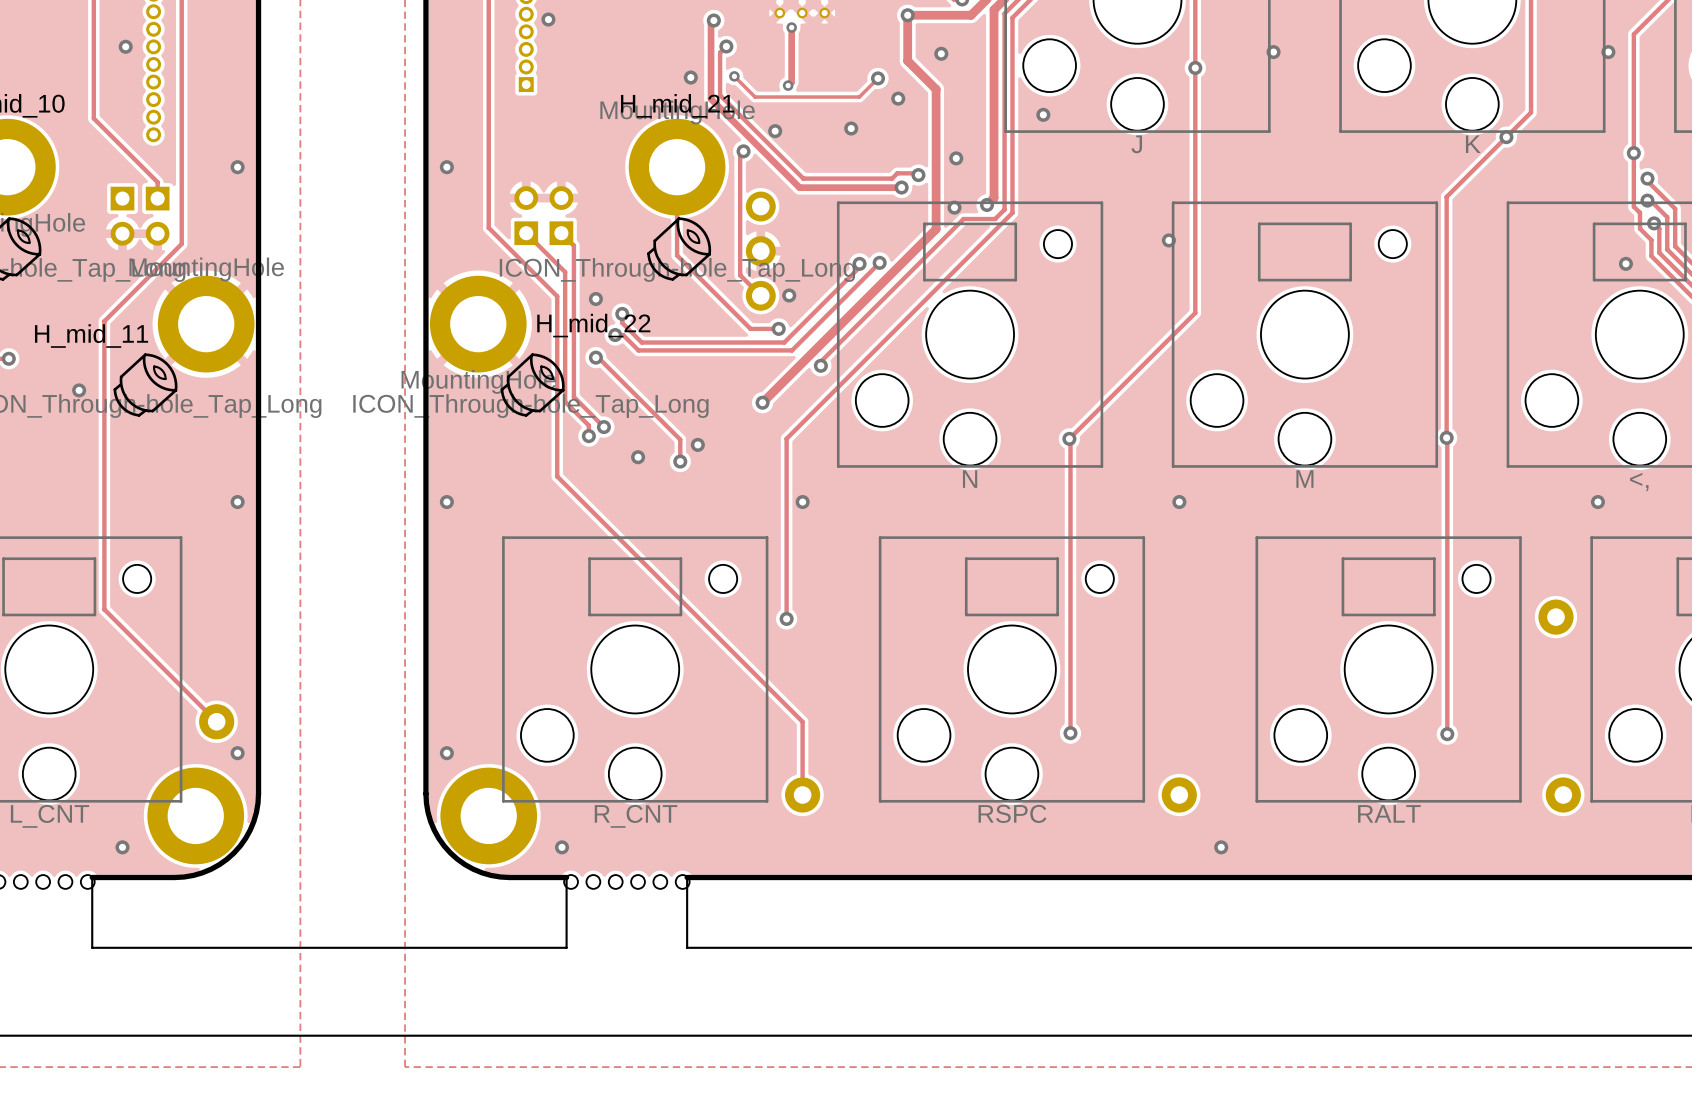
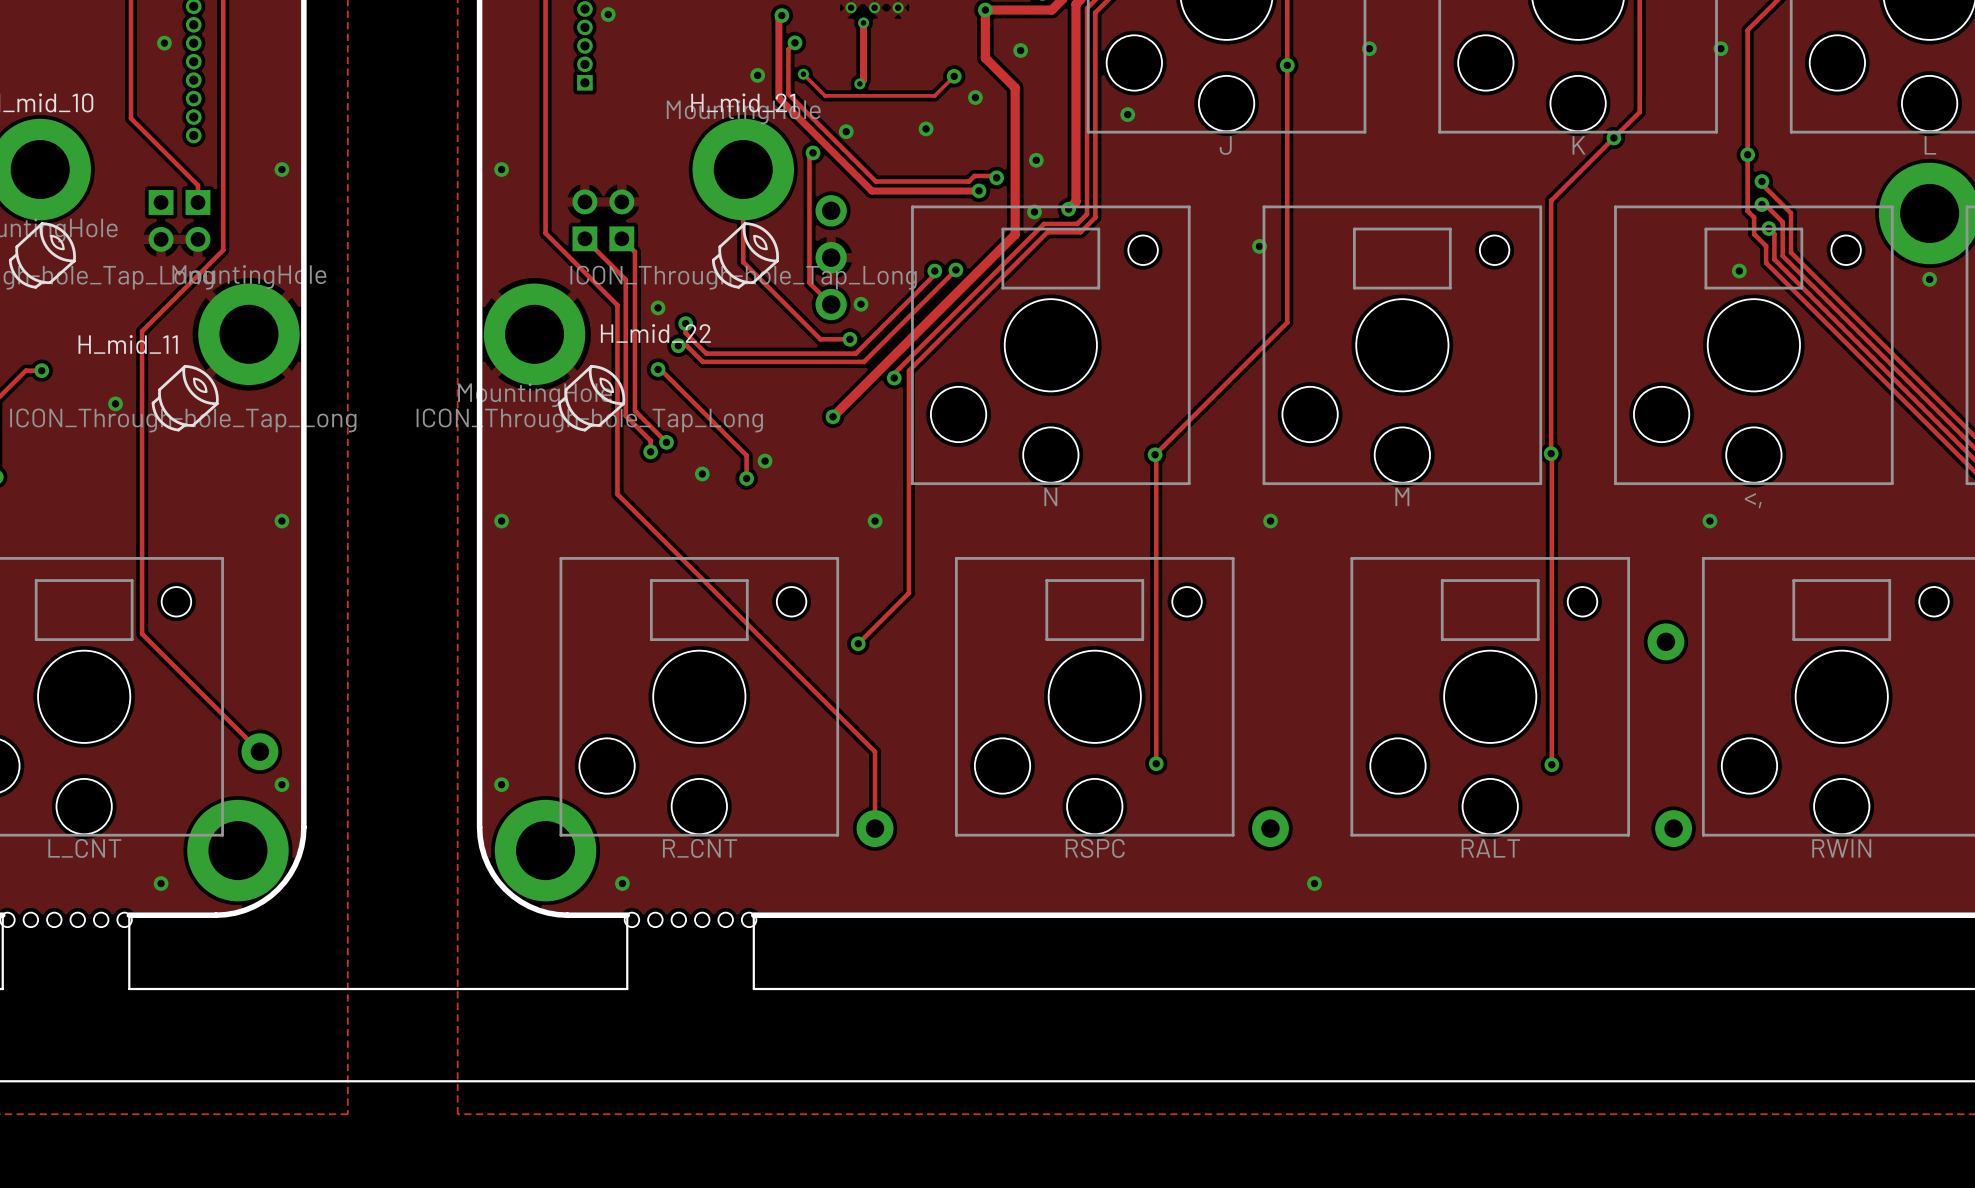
track: (998, 226) (786, 438) (786, 618) -> (1080, 232) (1047, 232) (908, 370) (908, 593) (858, 643)

